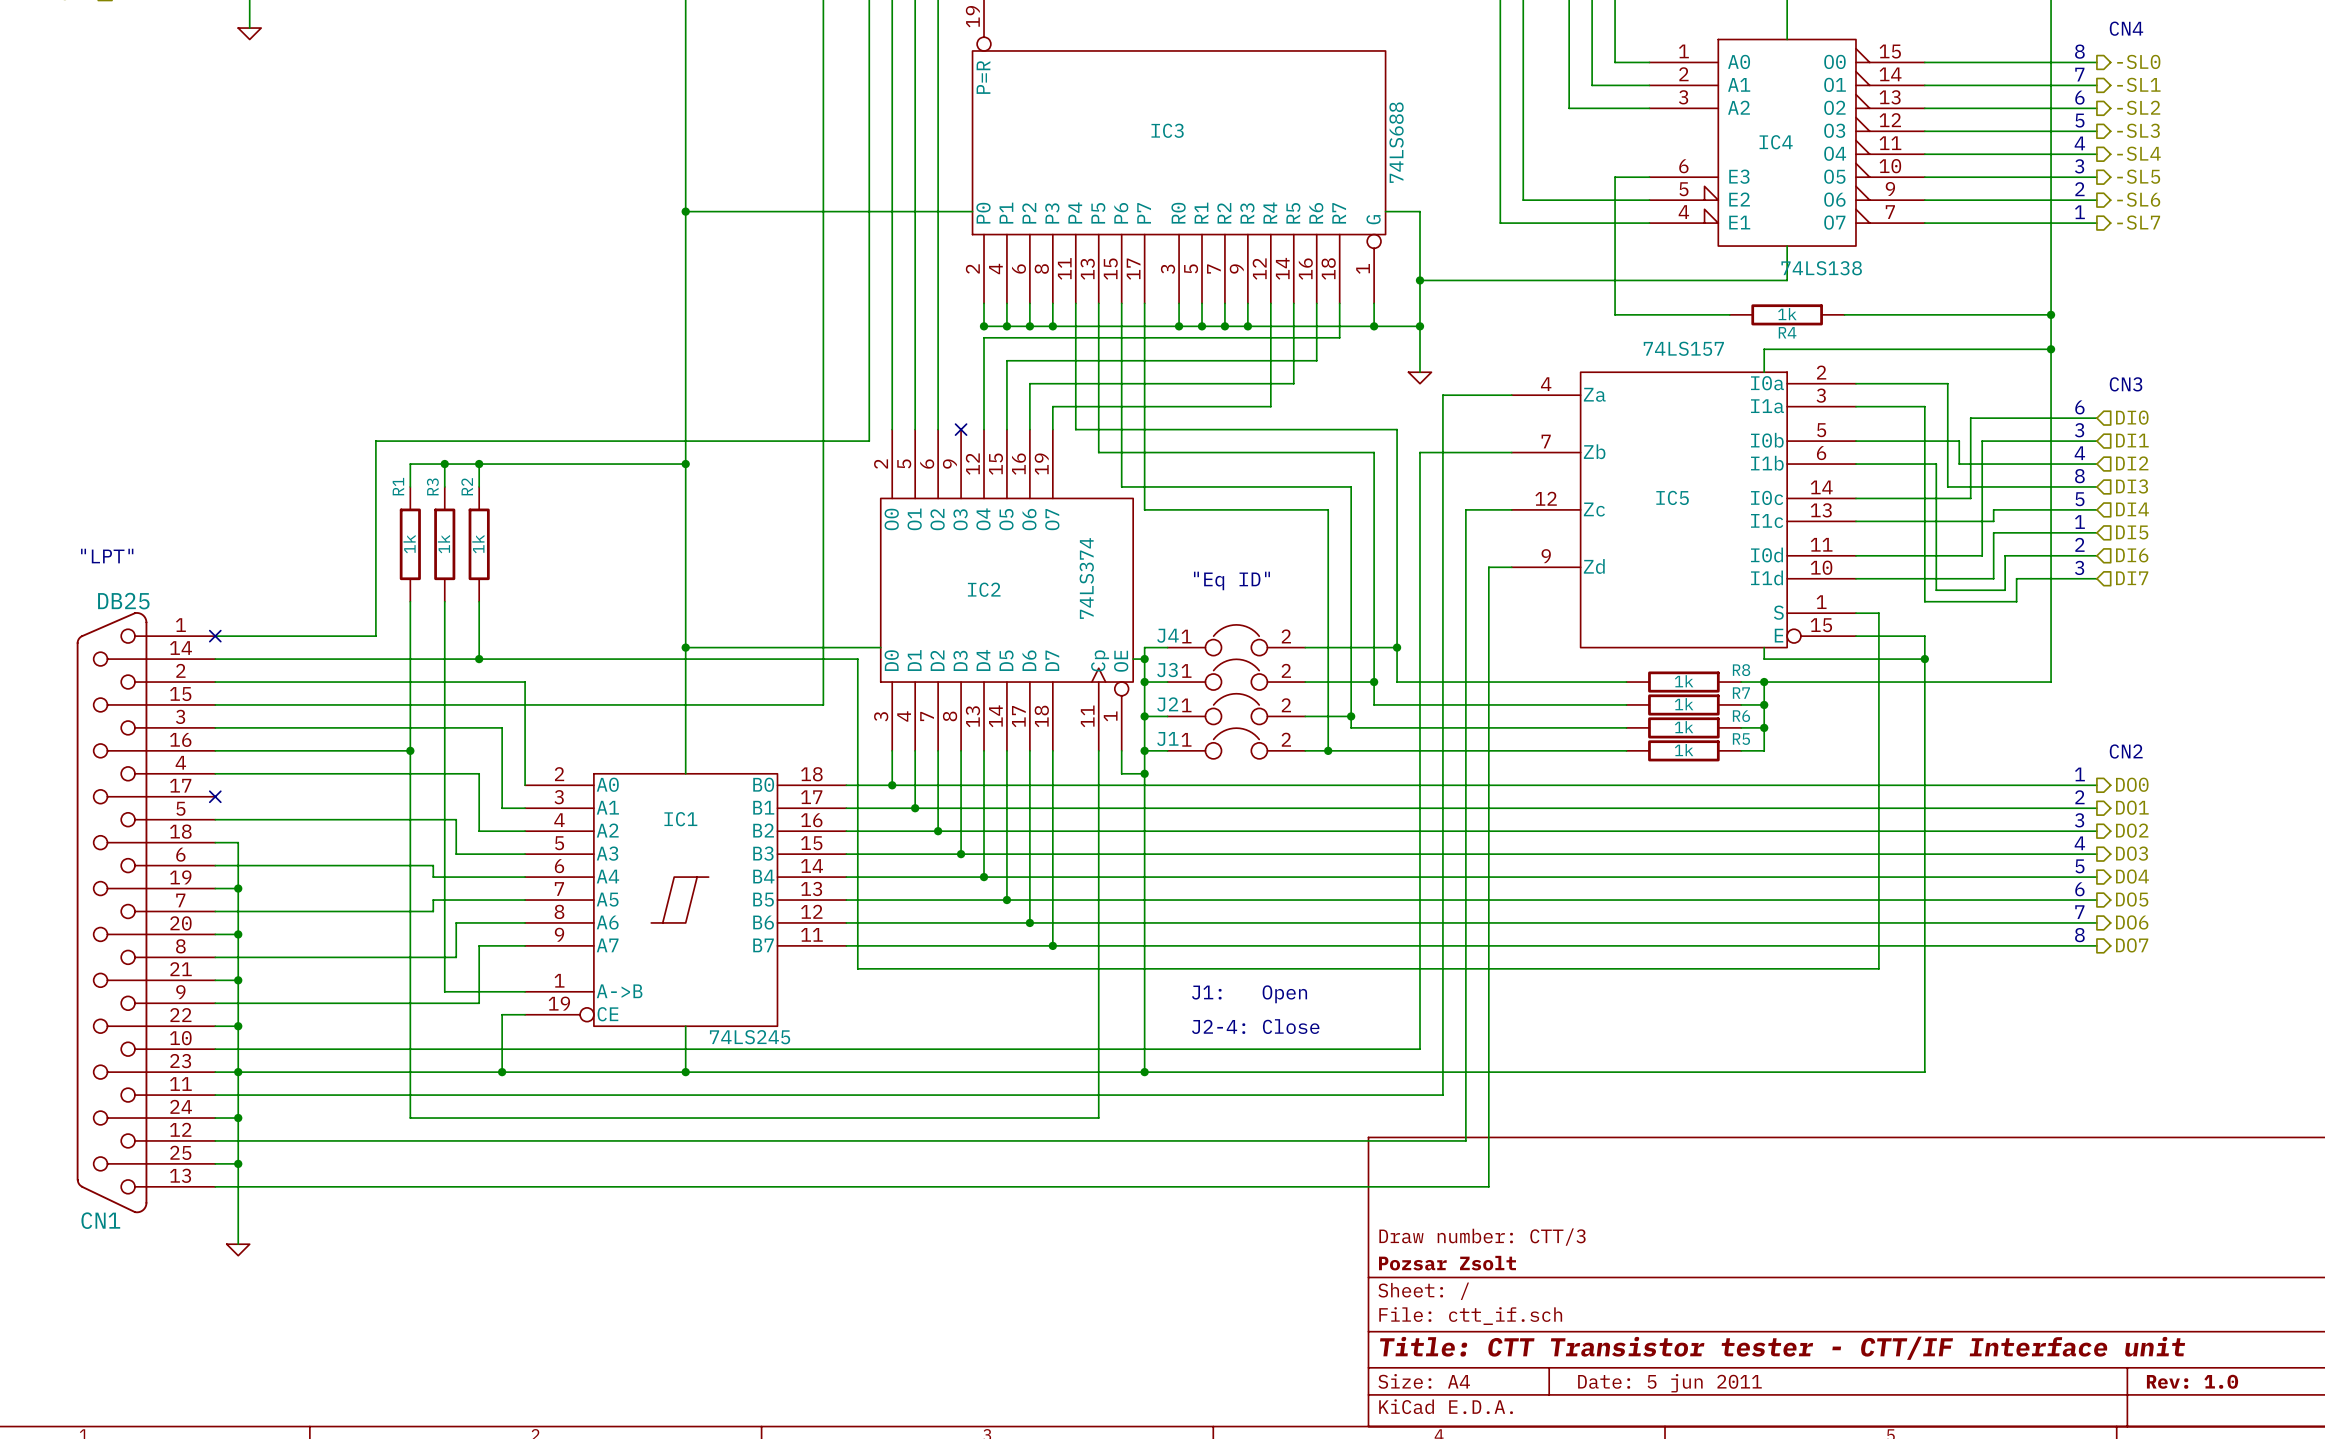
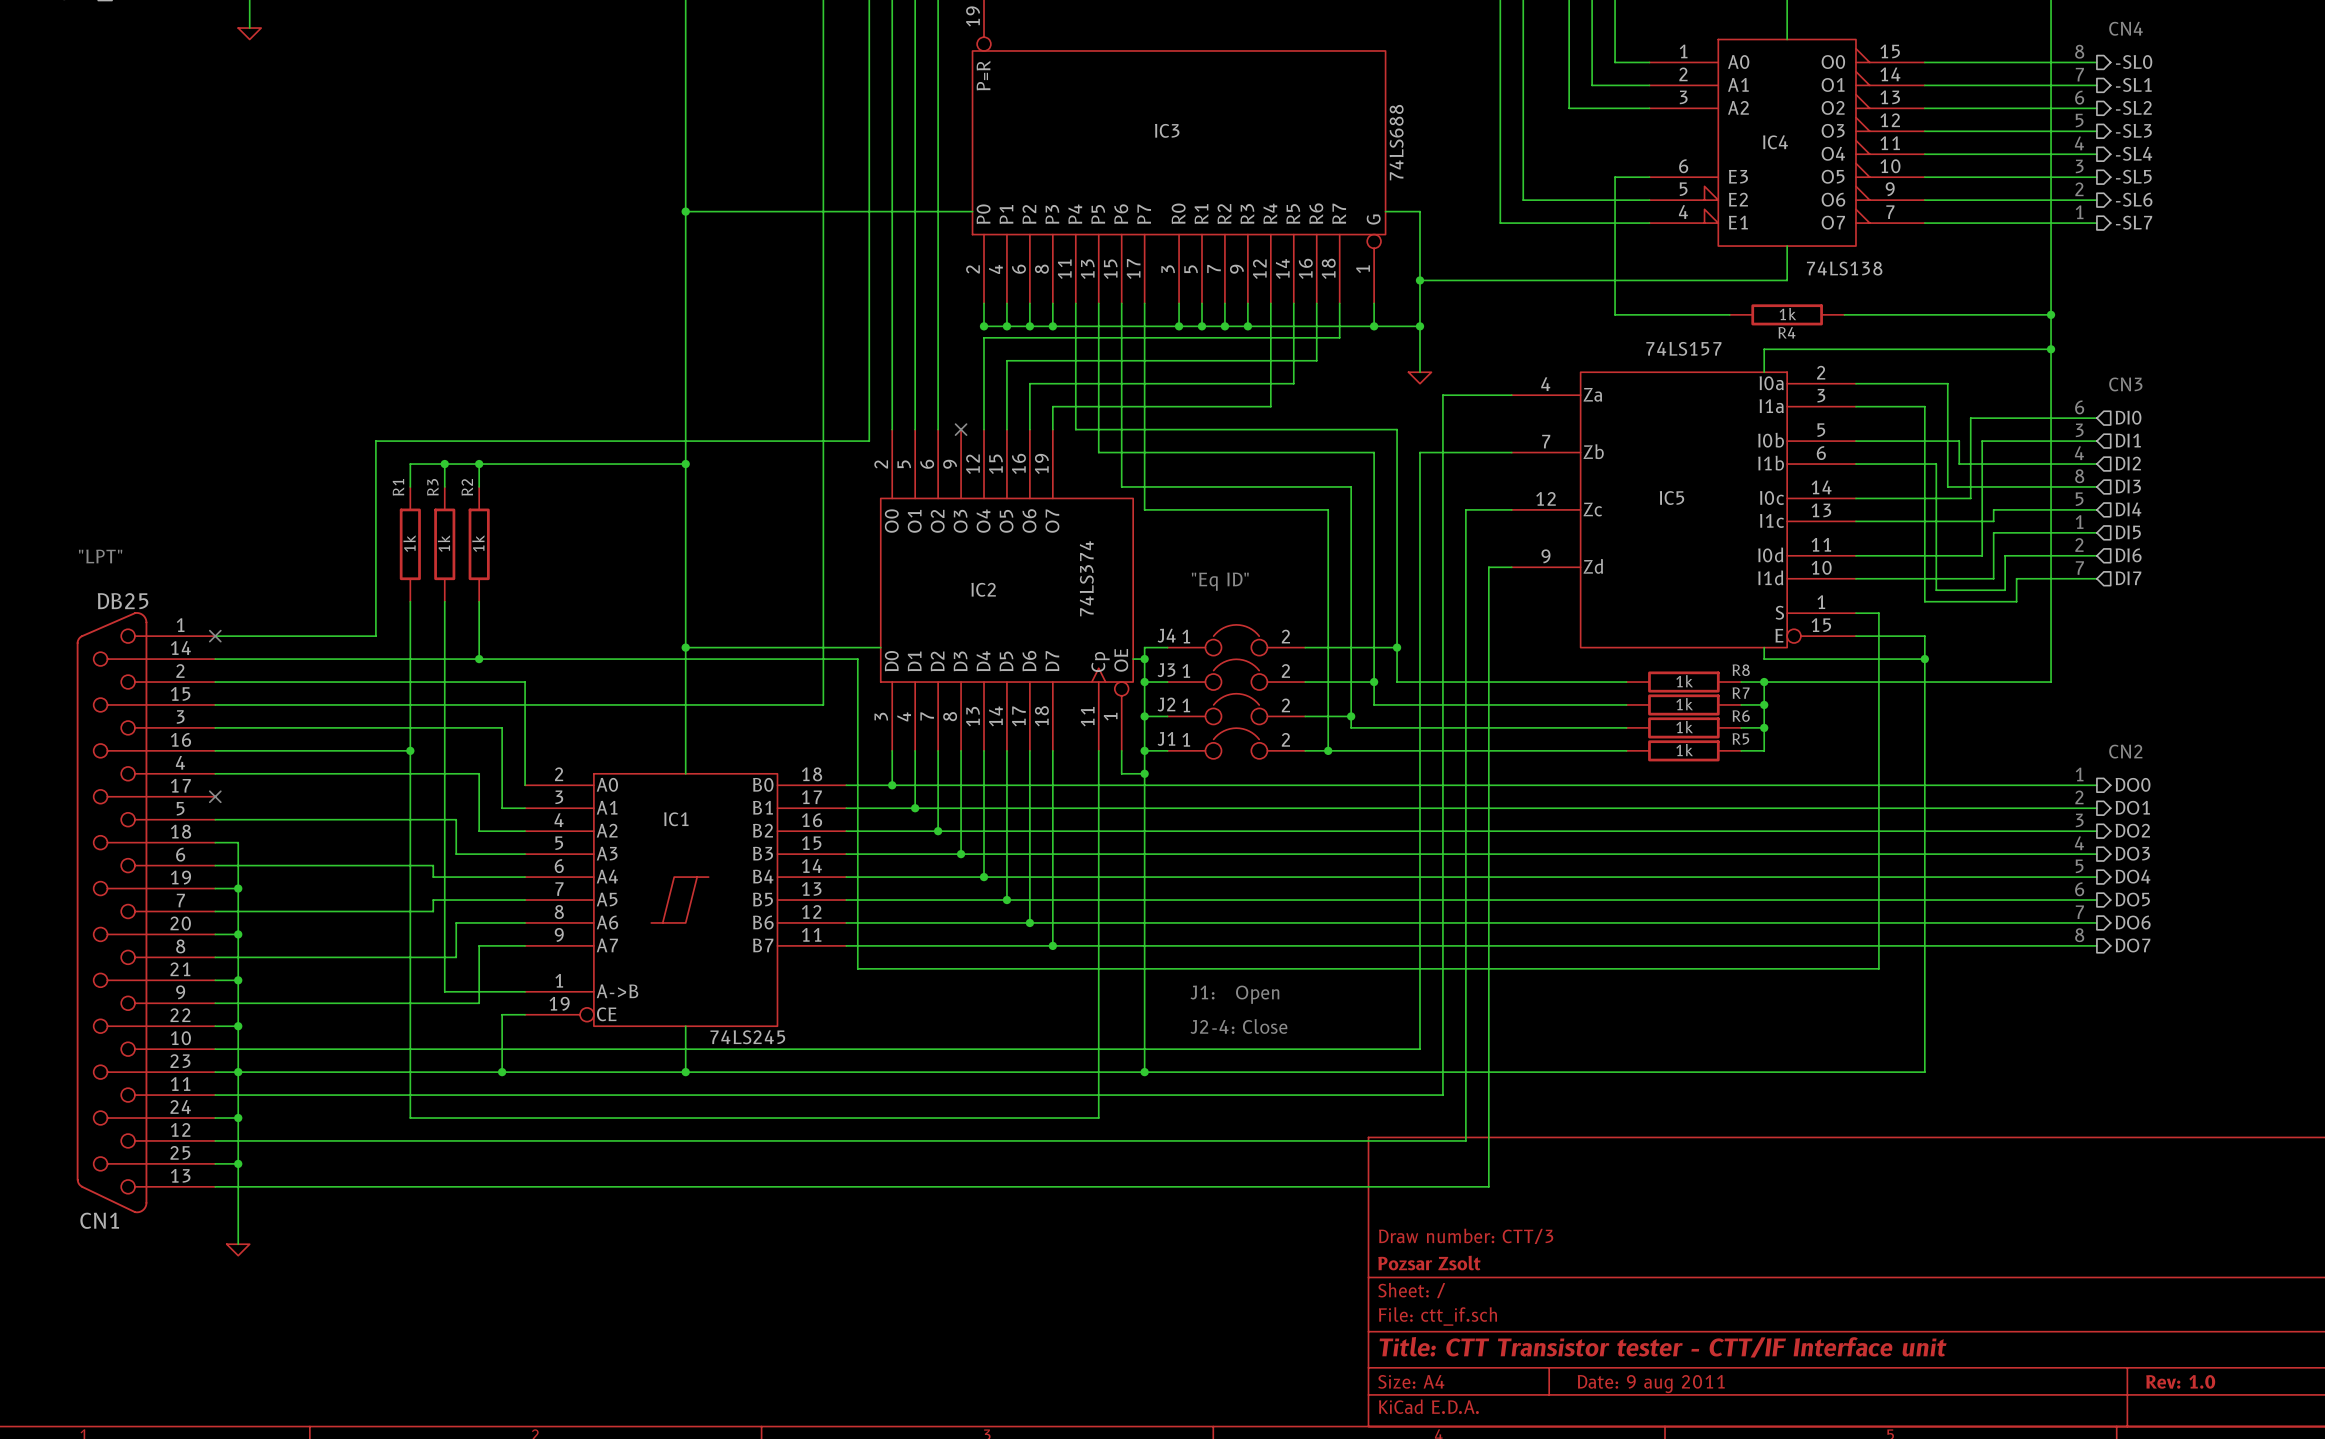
IC4 value position: 74LS138 (1821, 268) -> 74LS138 (1844, 268)
text: 3 (2079, 567) -> 7 (2079, 568)
title block: Date: 5 jun 2011 (1669, 1383) -> Date: 9 aug 2011 (1651, 1384)

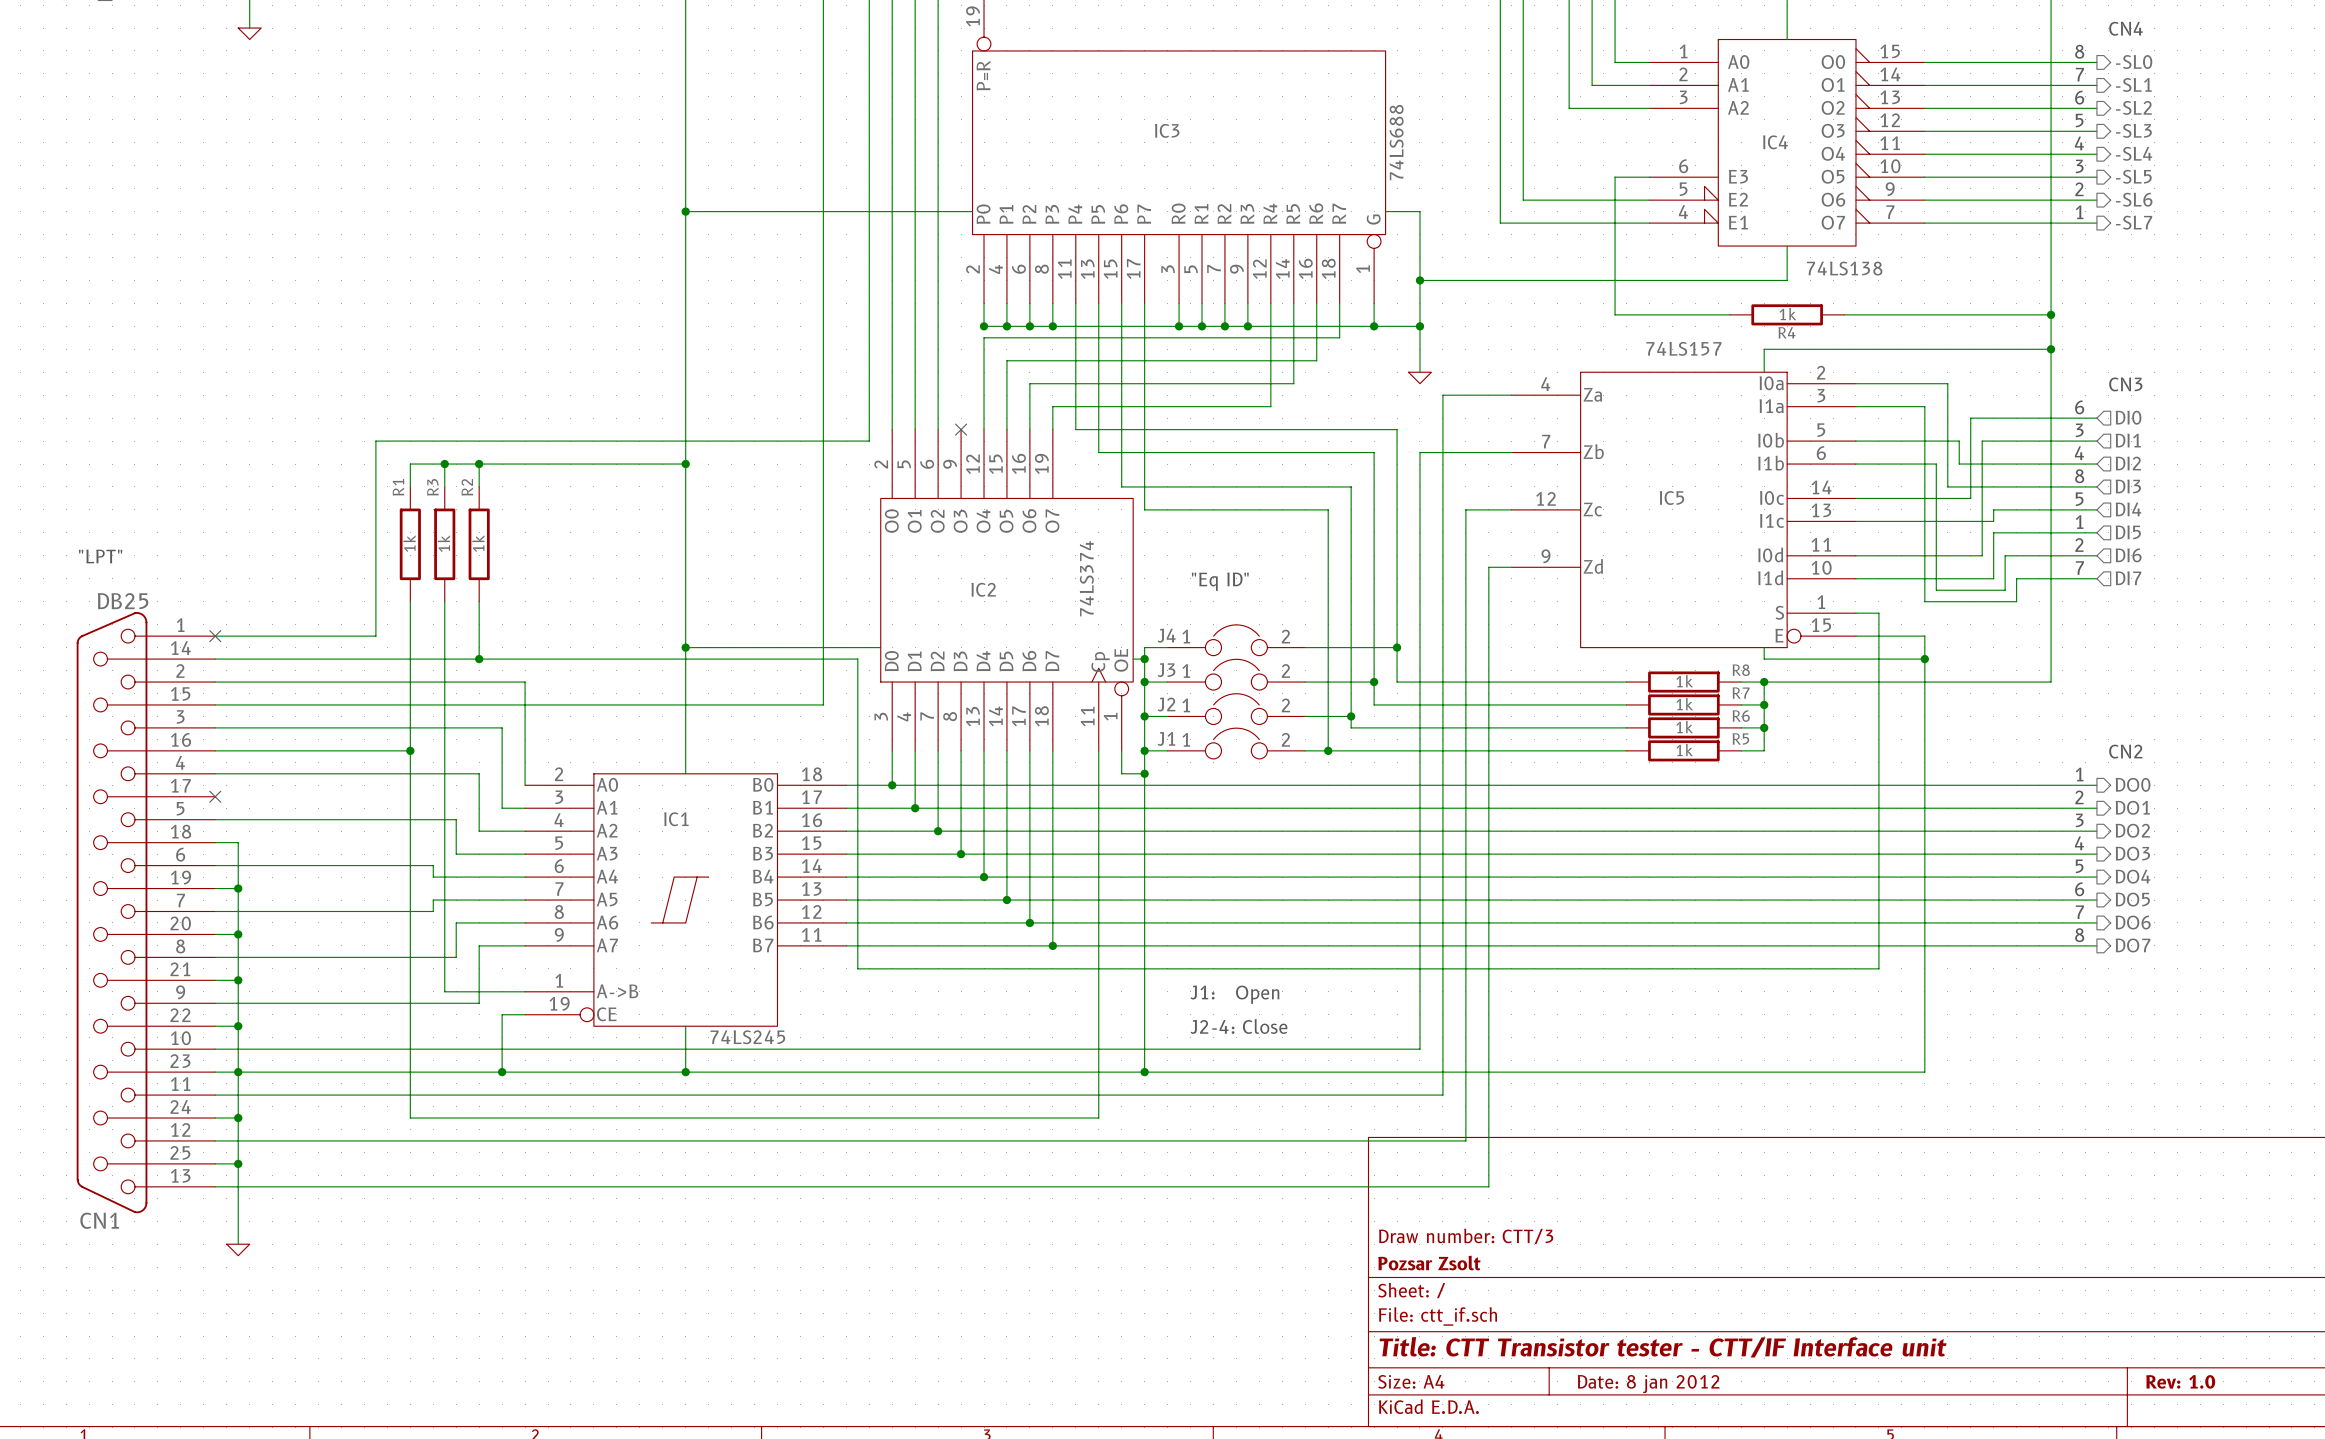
title block: Date: 9 aug 2011 (1651, 1384) -> Date: 8 jan 2012 (1648, 1384)

